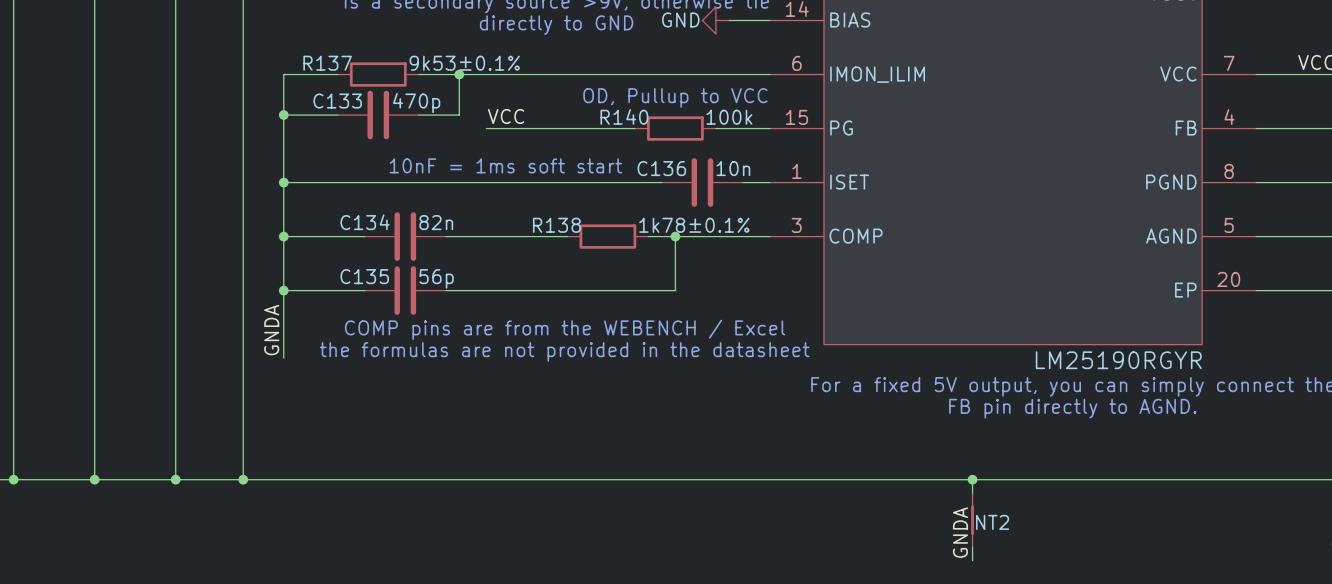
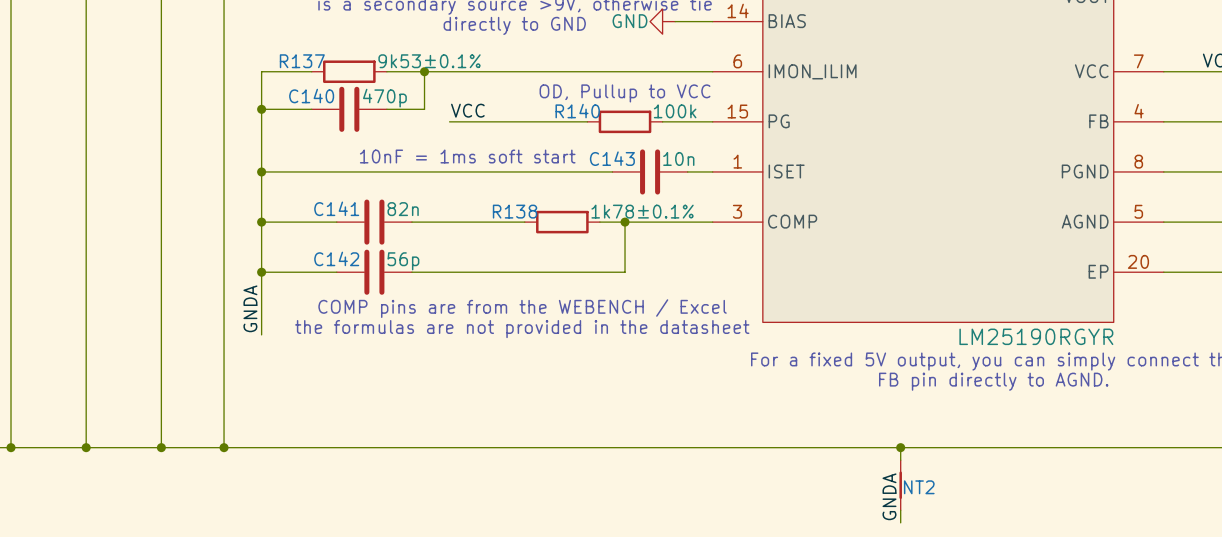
C133 name: C133 (337, 101) -> C140 (311, 96)
C136 name: C136 (661, 168) -> C143 (612, 158)
C134 name: C134 (365, 222) -> C141 (336, 208)
C135 name: C135 (364, 276) -> C142 (336, 258)

